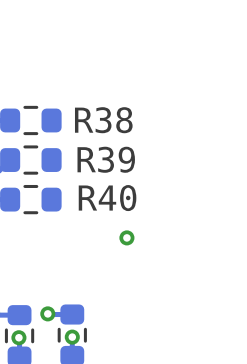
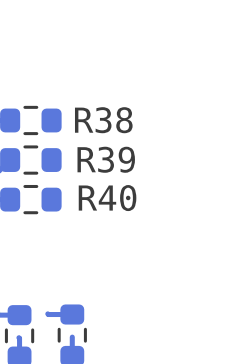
via: (126, 237) -> none
via: (47, 313) -> none
via: (18, 337) -> none
via: (72, 337) -> none

